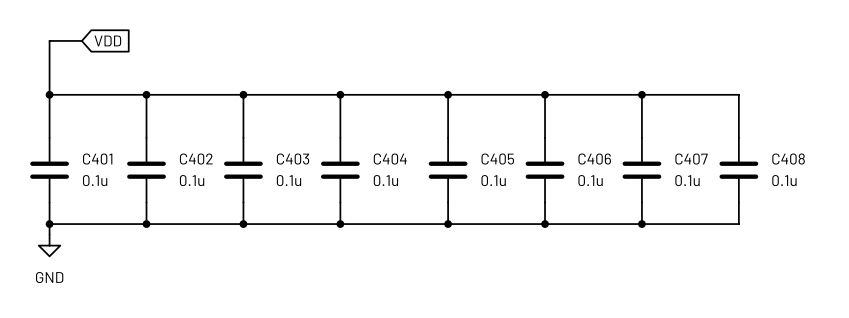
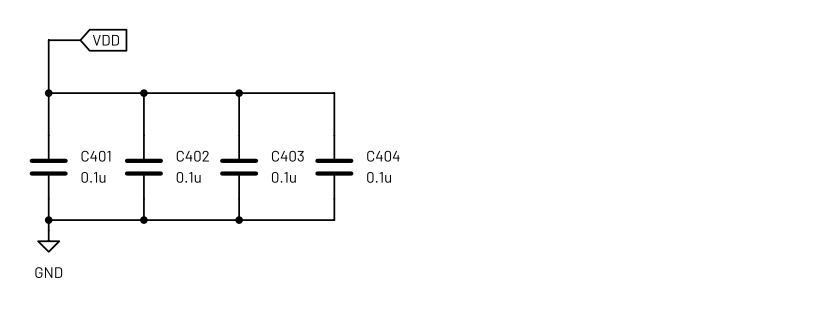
wire: (340, 94) (738, 94) (738, 137) -> none
junction: (340, 94) -> none
wire: (448, 94) (448, 137) -> none
junction: (448, 94) -> none
wire: (545, 94) (545, 137) -> none
junction: (545, 94) -> none
wire: (641, 94) (641, 137) -> none
junction: (641, 94) -> none
C405: 0.1u (448, 170) -> none
C406: 0.1u (545, 170) -> none
C407: 0.1u (641, 170) -> none
C408: 0.1u (738, 170) -> none
wire: (448, 202) (448, 224) -> none
wire: (545, 202) (545, 224) -> none
wire: (641, 202) (641, 224) -> none
wire: (738, 202) (738, 224) (340, 224) -> none
junction: (340, 224) -> none
junction: (448, 224) -> none
junction: (545, 224) -> none
junction: (641, 224) -> none

